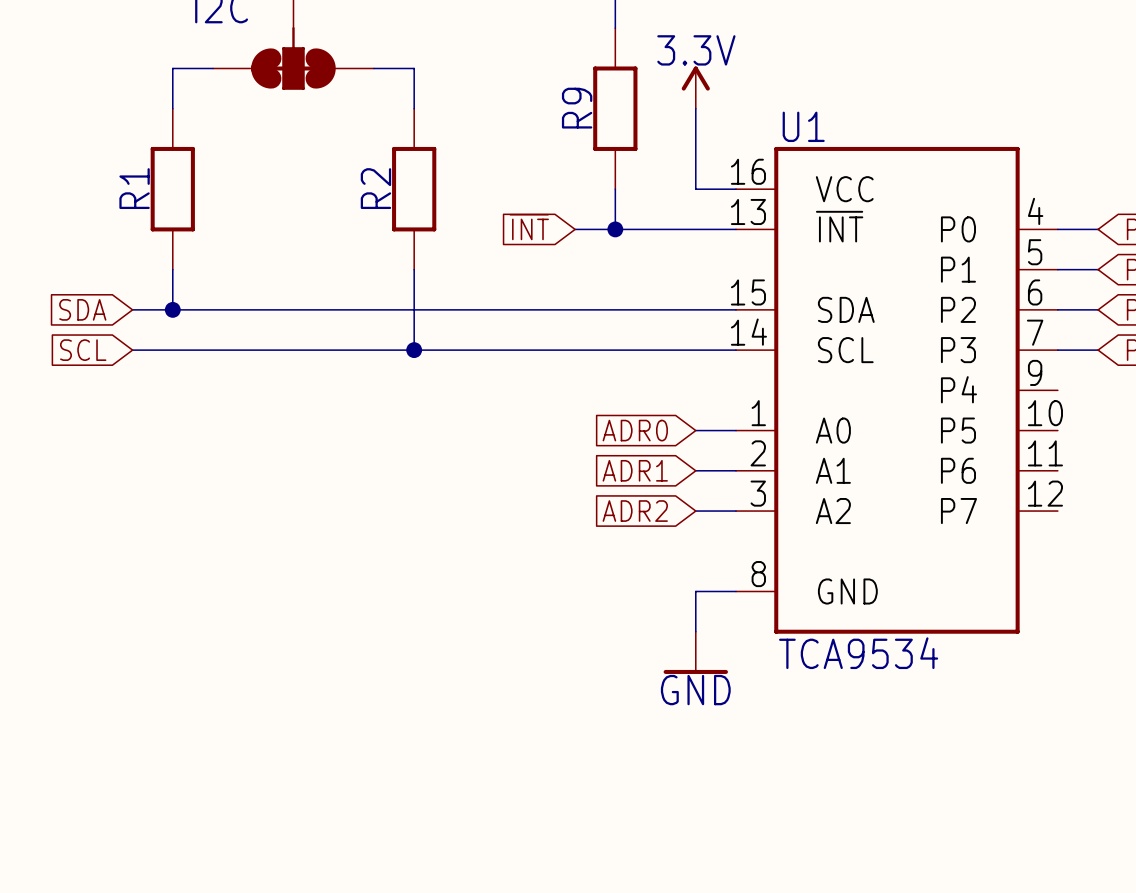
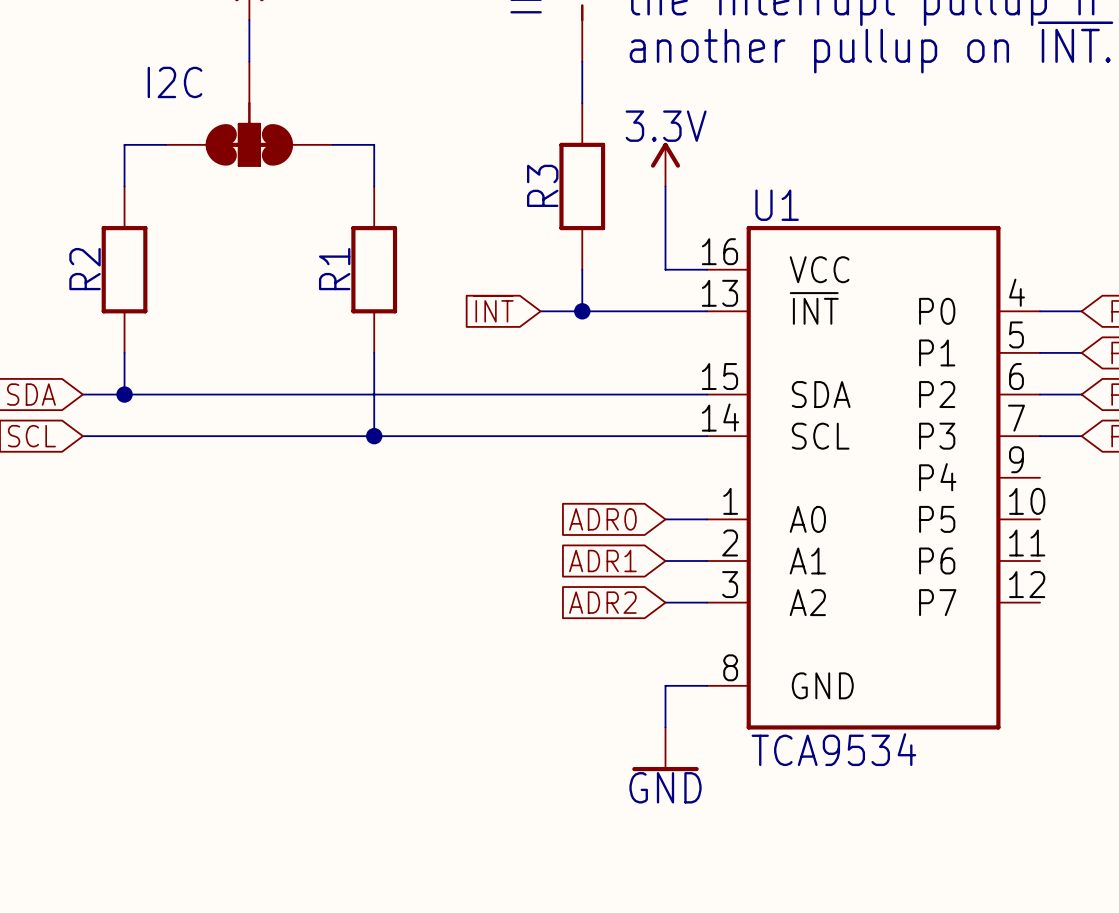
R9 name: R9 (577, 108) -> R3 (542, 185)
R1 name: R1 (134, 188) -> R2 (85, 269)
R2 name: R2 (375, 188) -> R1 (334, 269)

